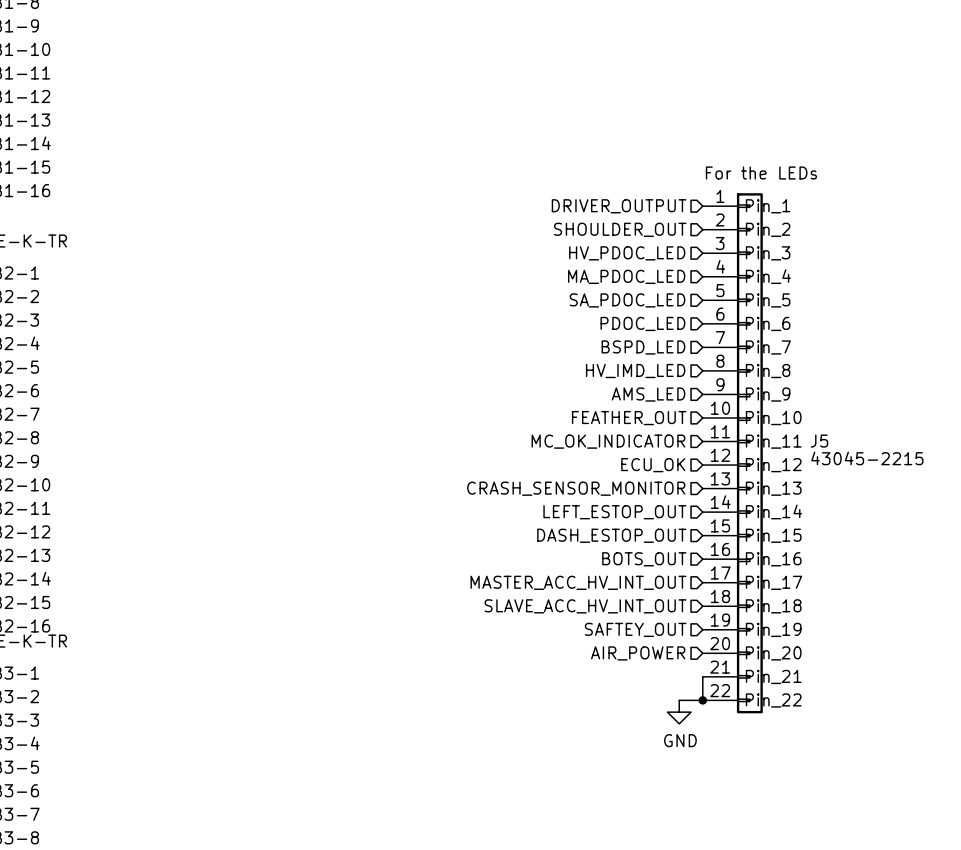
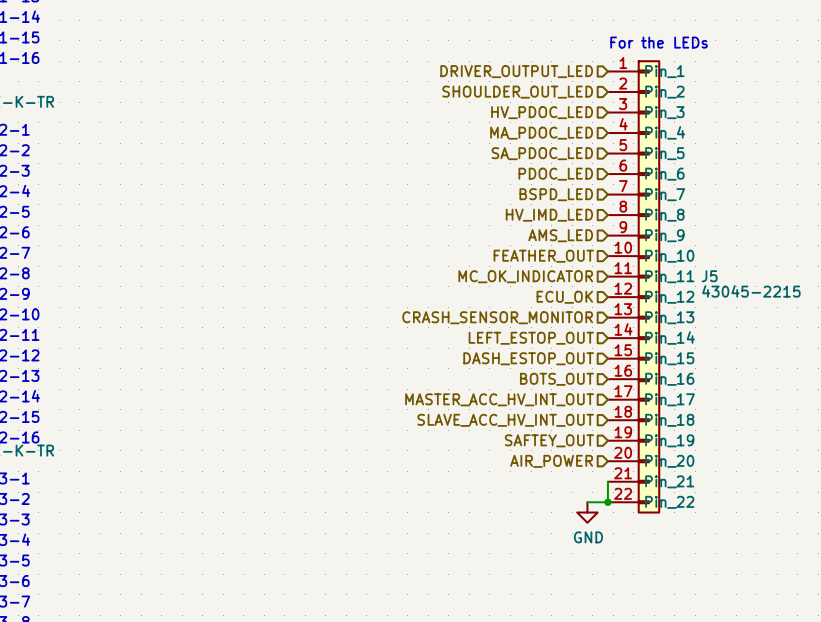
hierarchical label: DRIVER_OUTPUT (619, 206) -> DRIVER_OUTPUT_LED (516, 71)
hierarchical label: SHOULDER_OUT (620, 229) -> SHOULDER_OUT_LED (517, 92)

